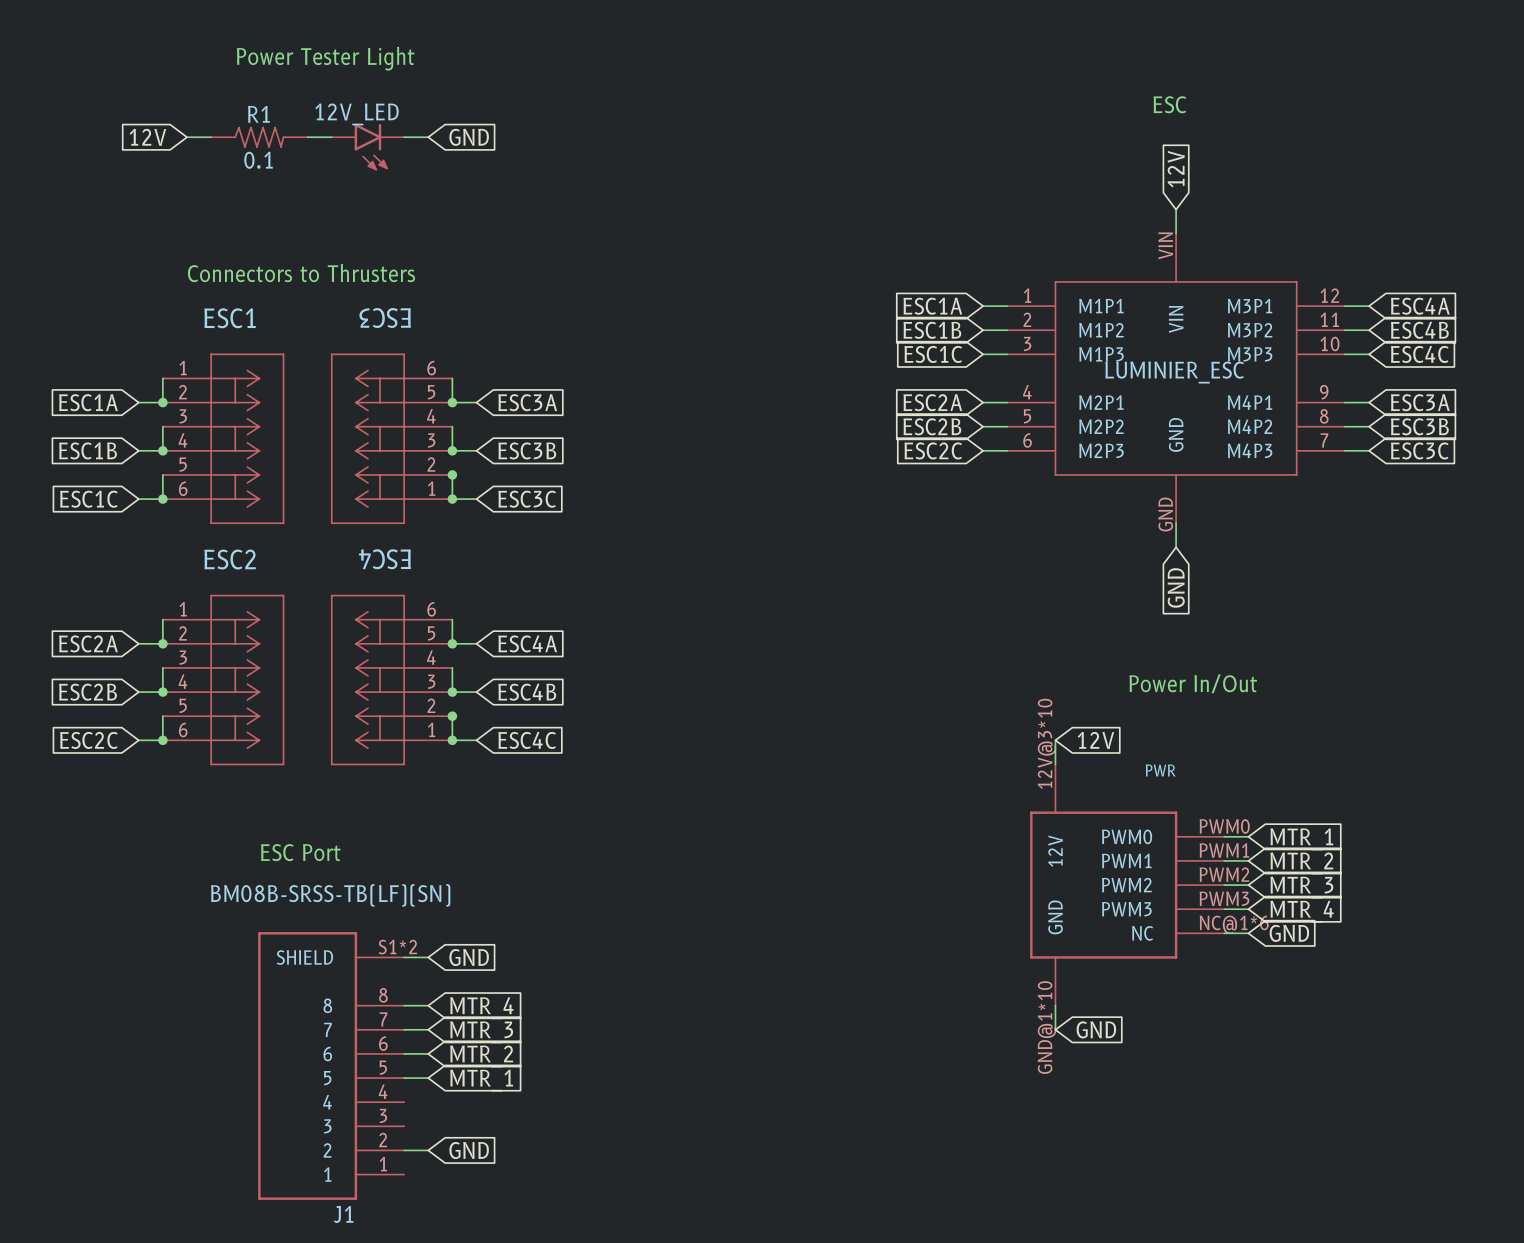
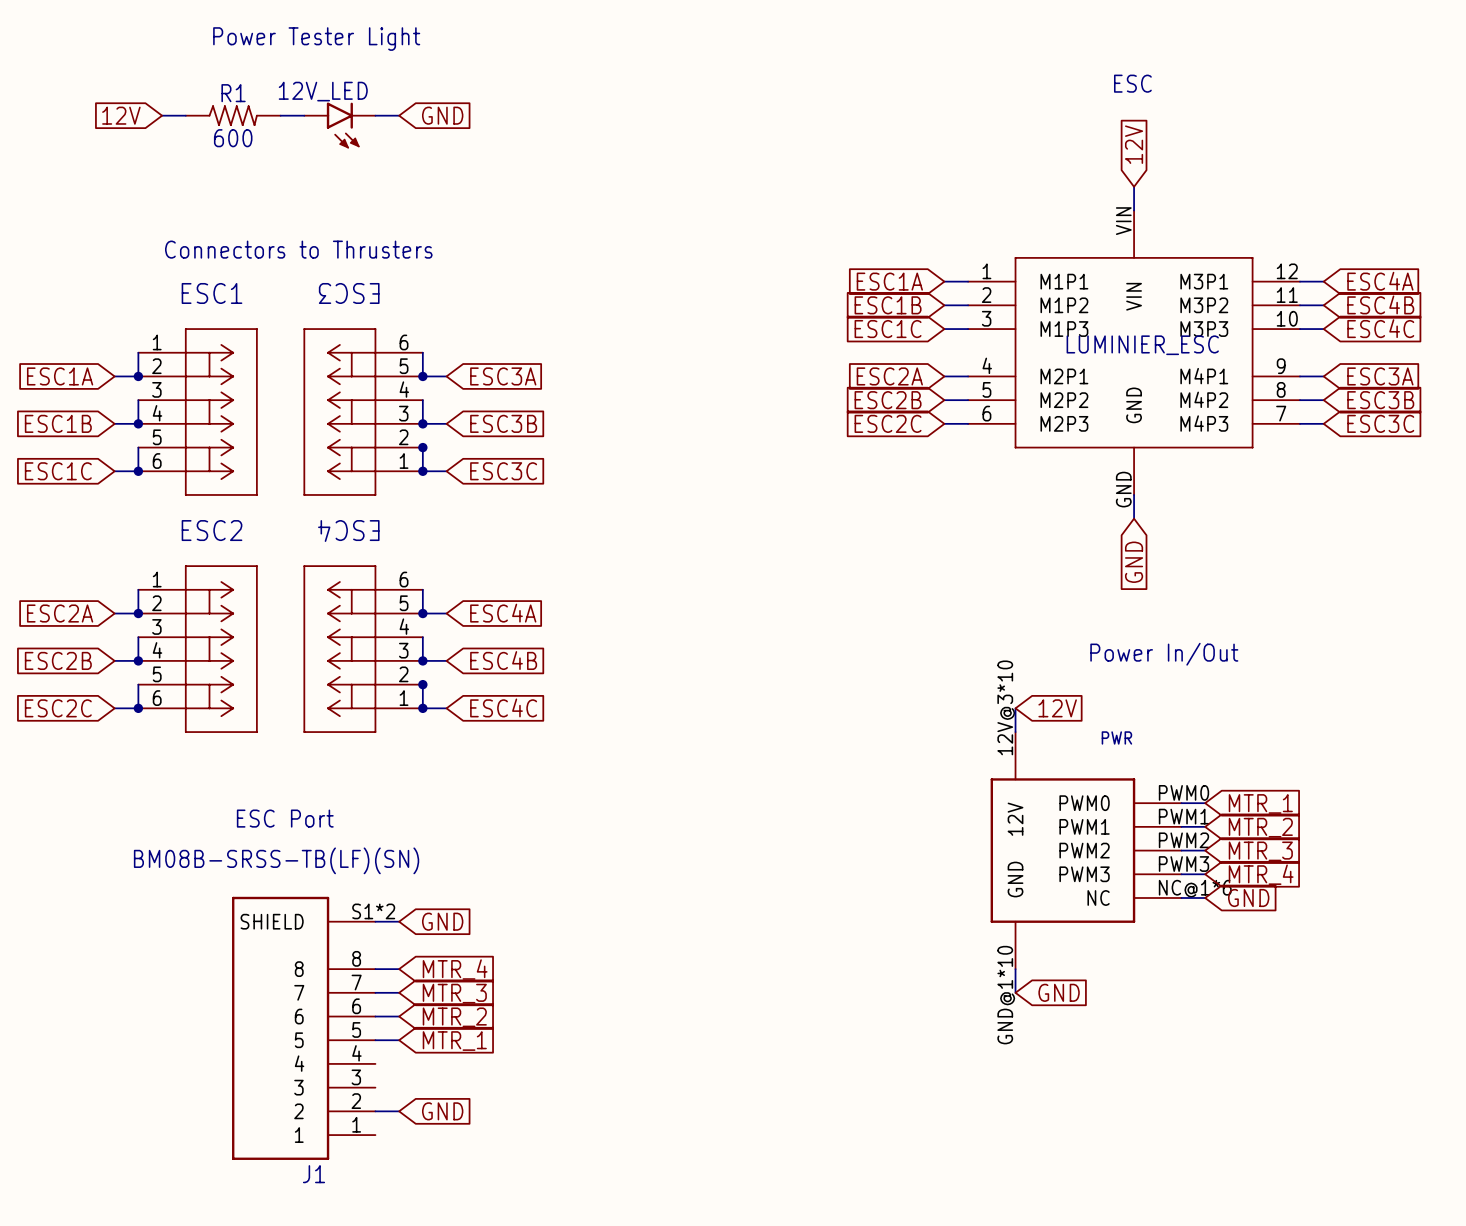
R1 value: 0.1 (258, 160) -> 600 (233, 138)

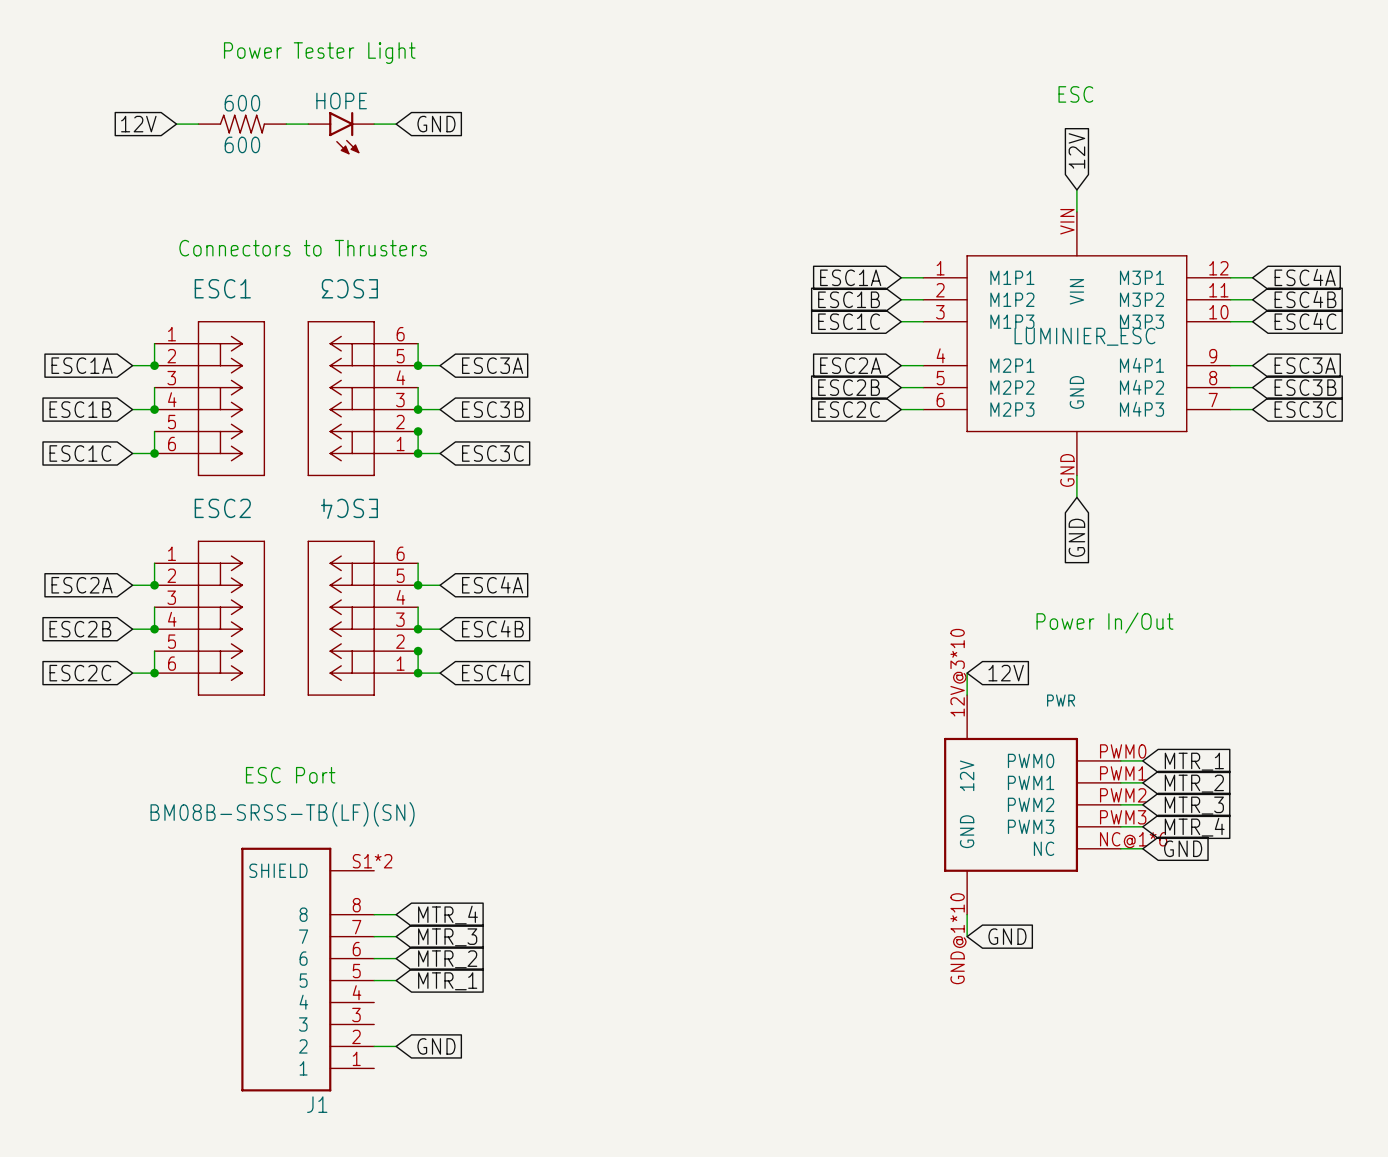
12V_LED name: 12V_LED (323, 91) -> HOPE (341, 101)
R1 name: R1 (233, 93) -> 600 (242, 103)
wire: (375, 921) (399, 921) -> none
global label: GND (442, 921) -> none

